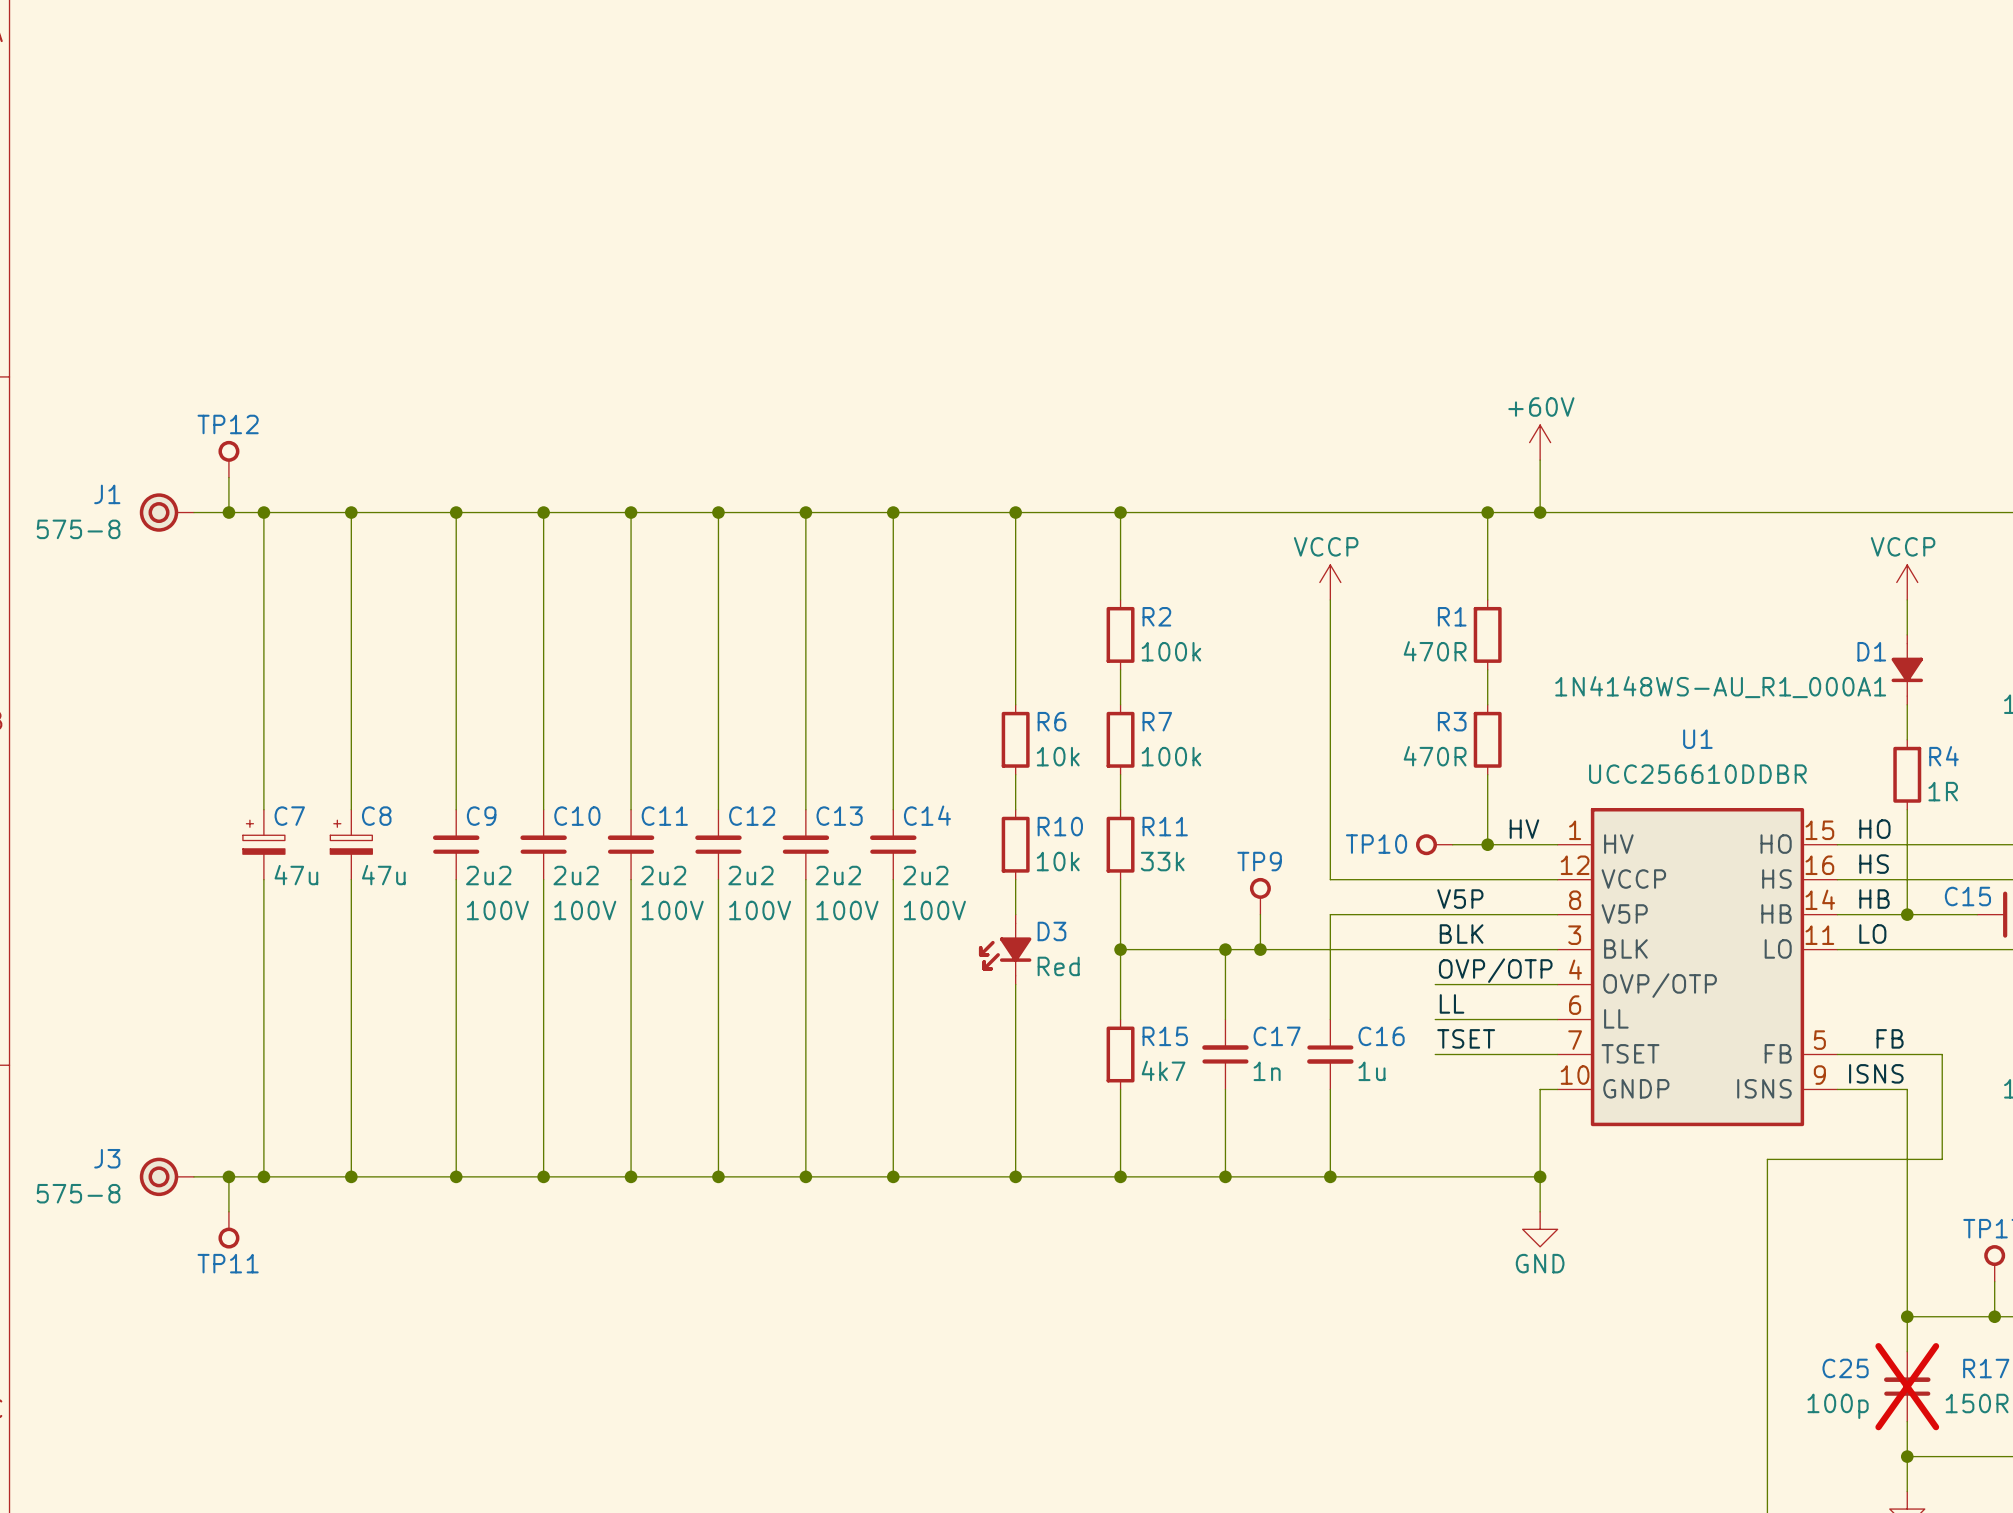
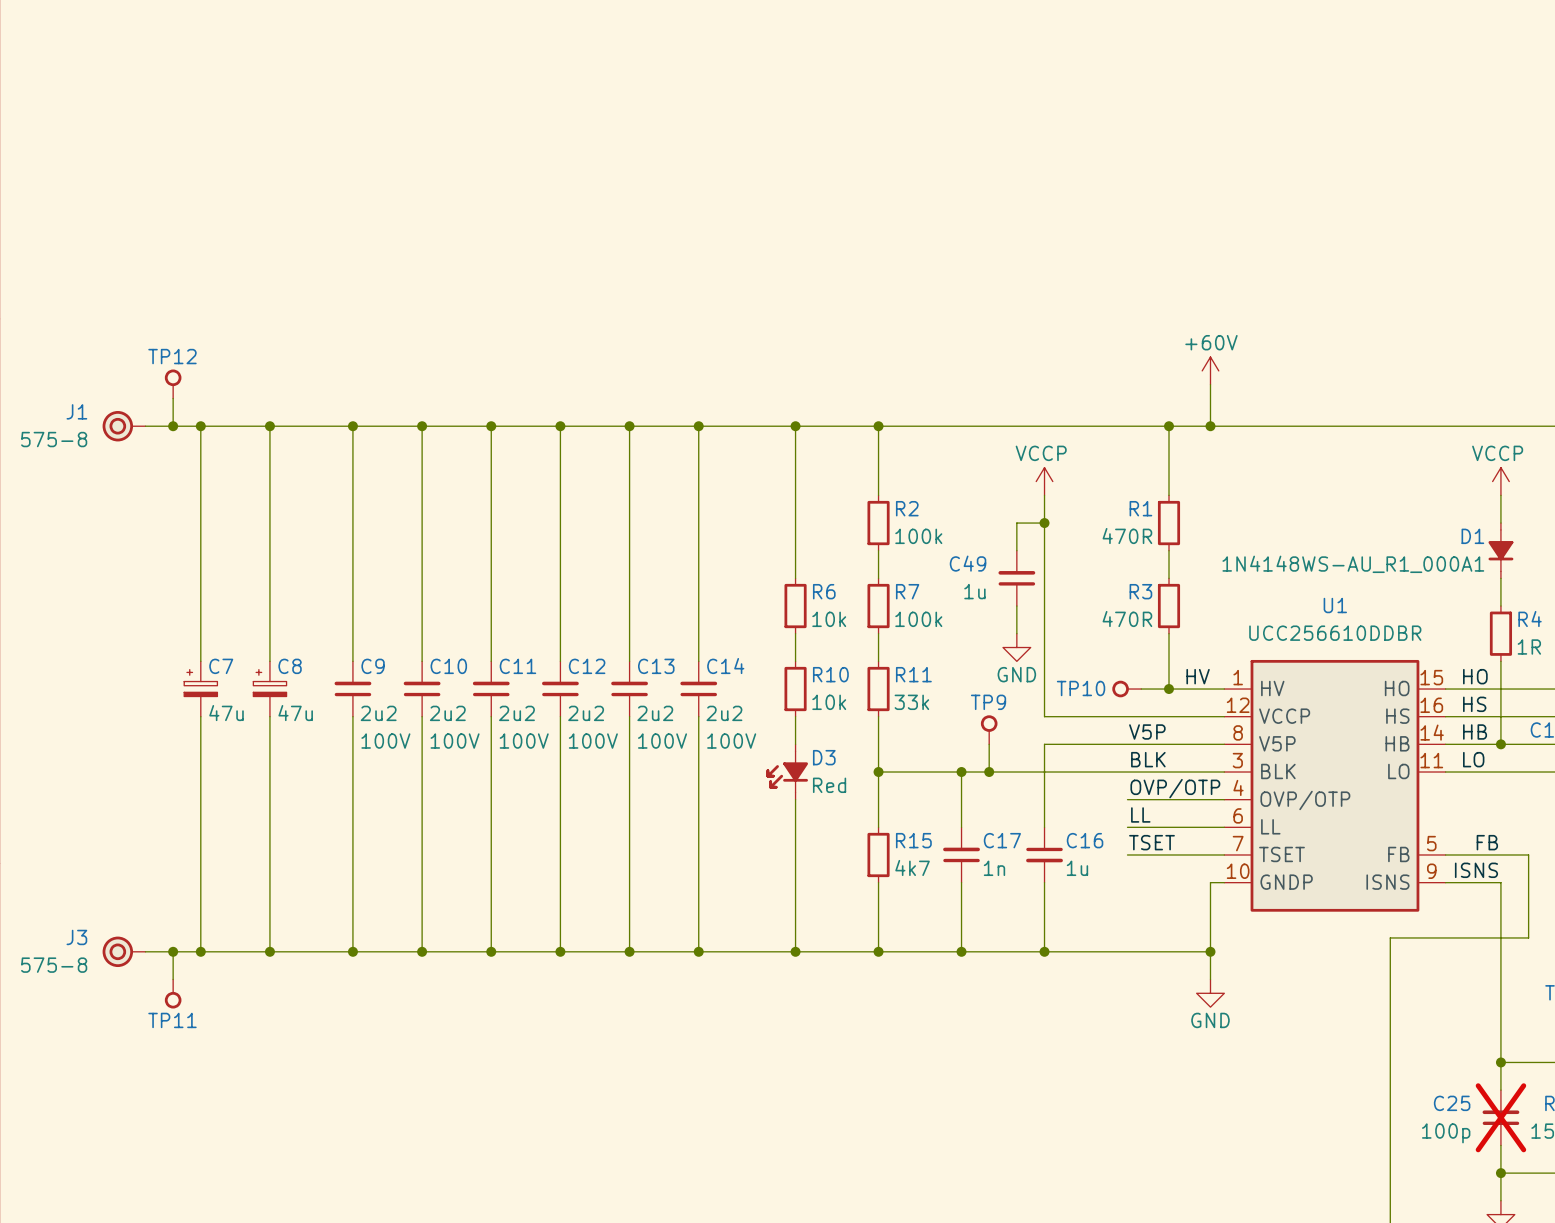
wire: none -> (1044, 523) (1016, 523) (1016, 550)
junction: none -> (1044, 523)
C49: none -> (1016, 578)
wire: none -> (1016, 606) (1016, 633)
power symbol: none -> GND (1016, 647)

